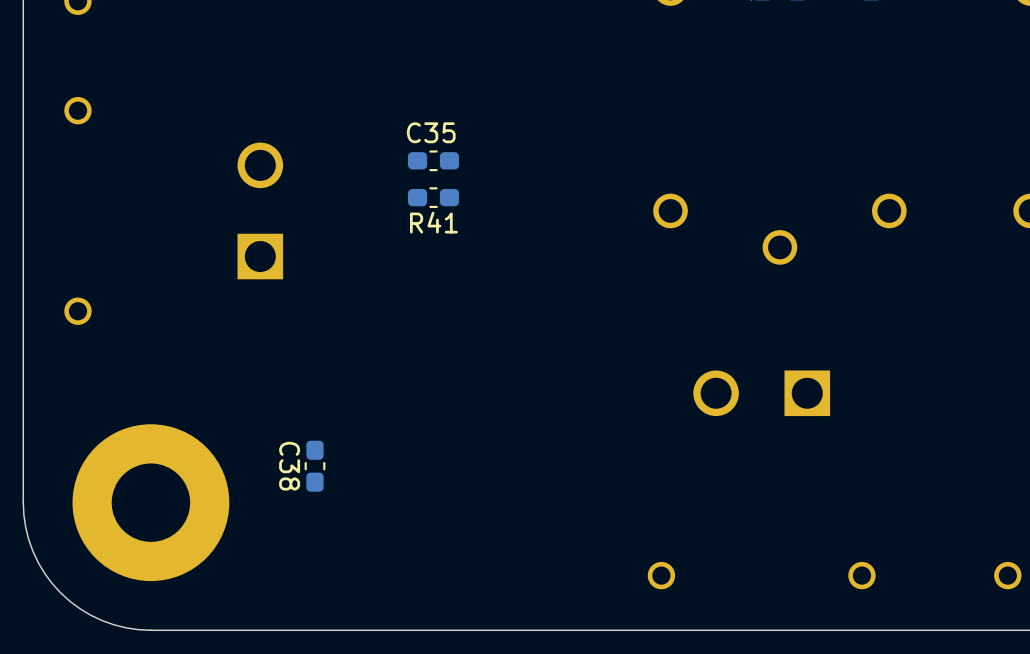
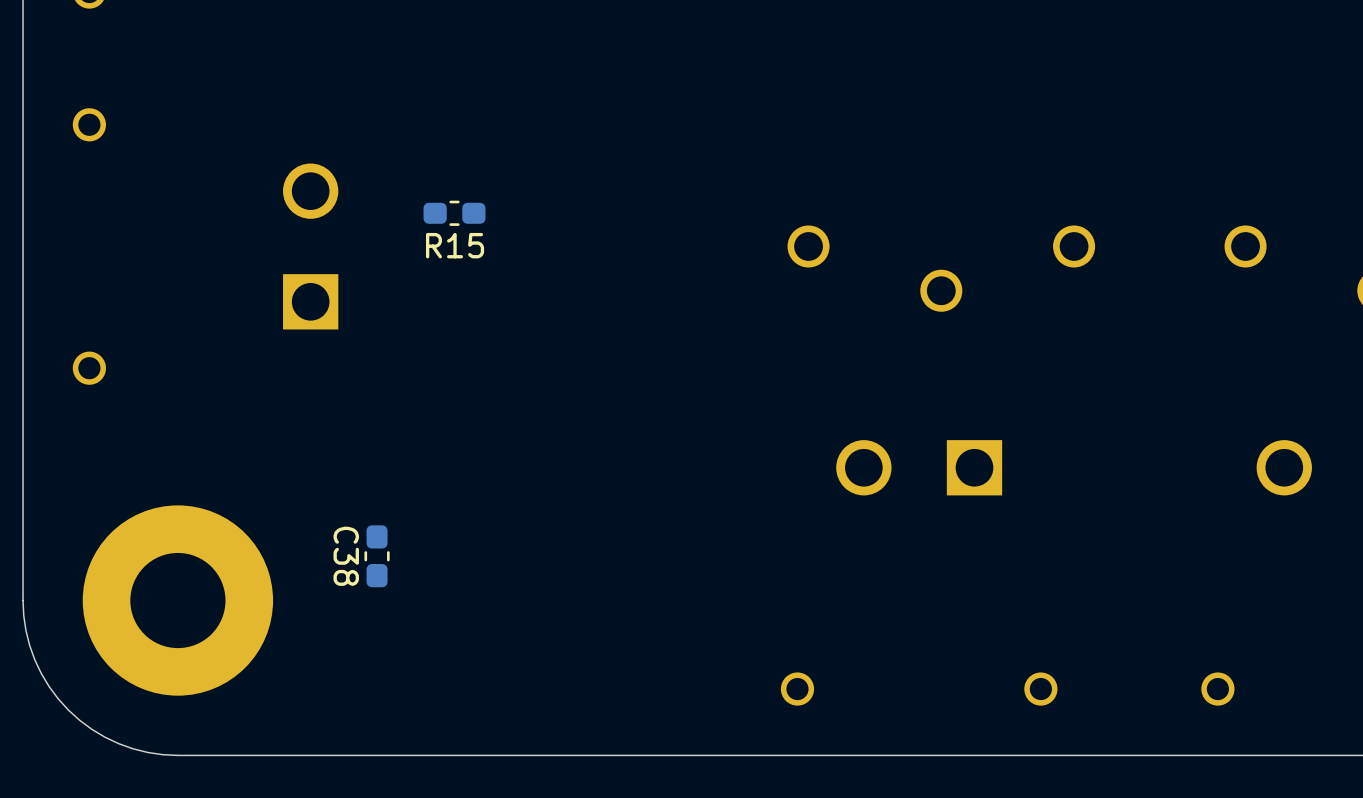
C35: (433, 160) -> none
R15: none -> (454, 213)
R41: (433, 197) -> none

